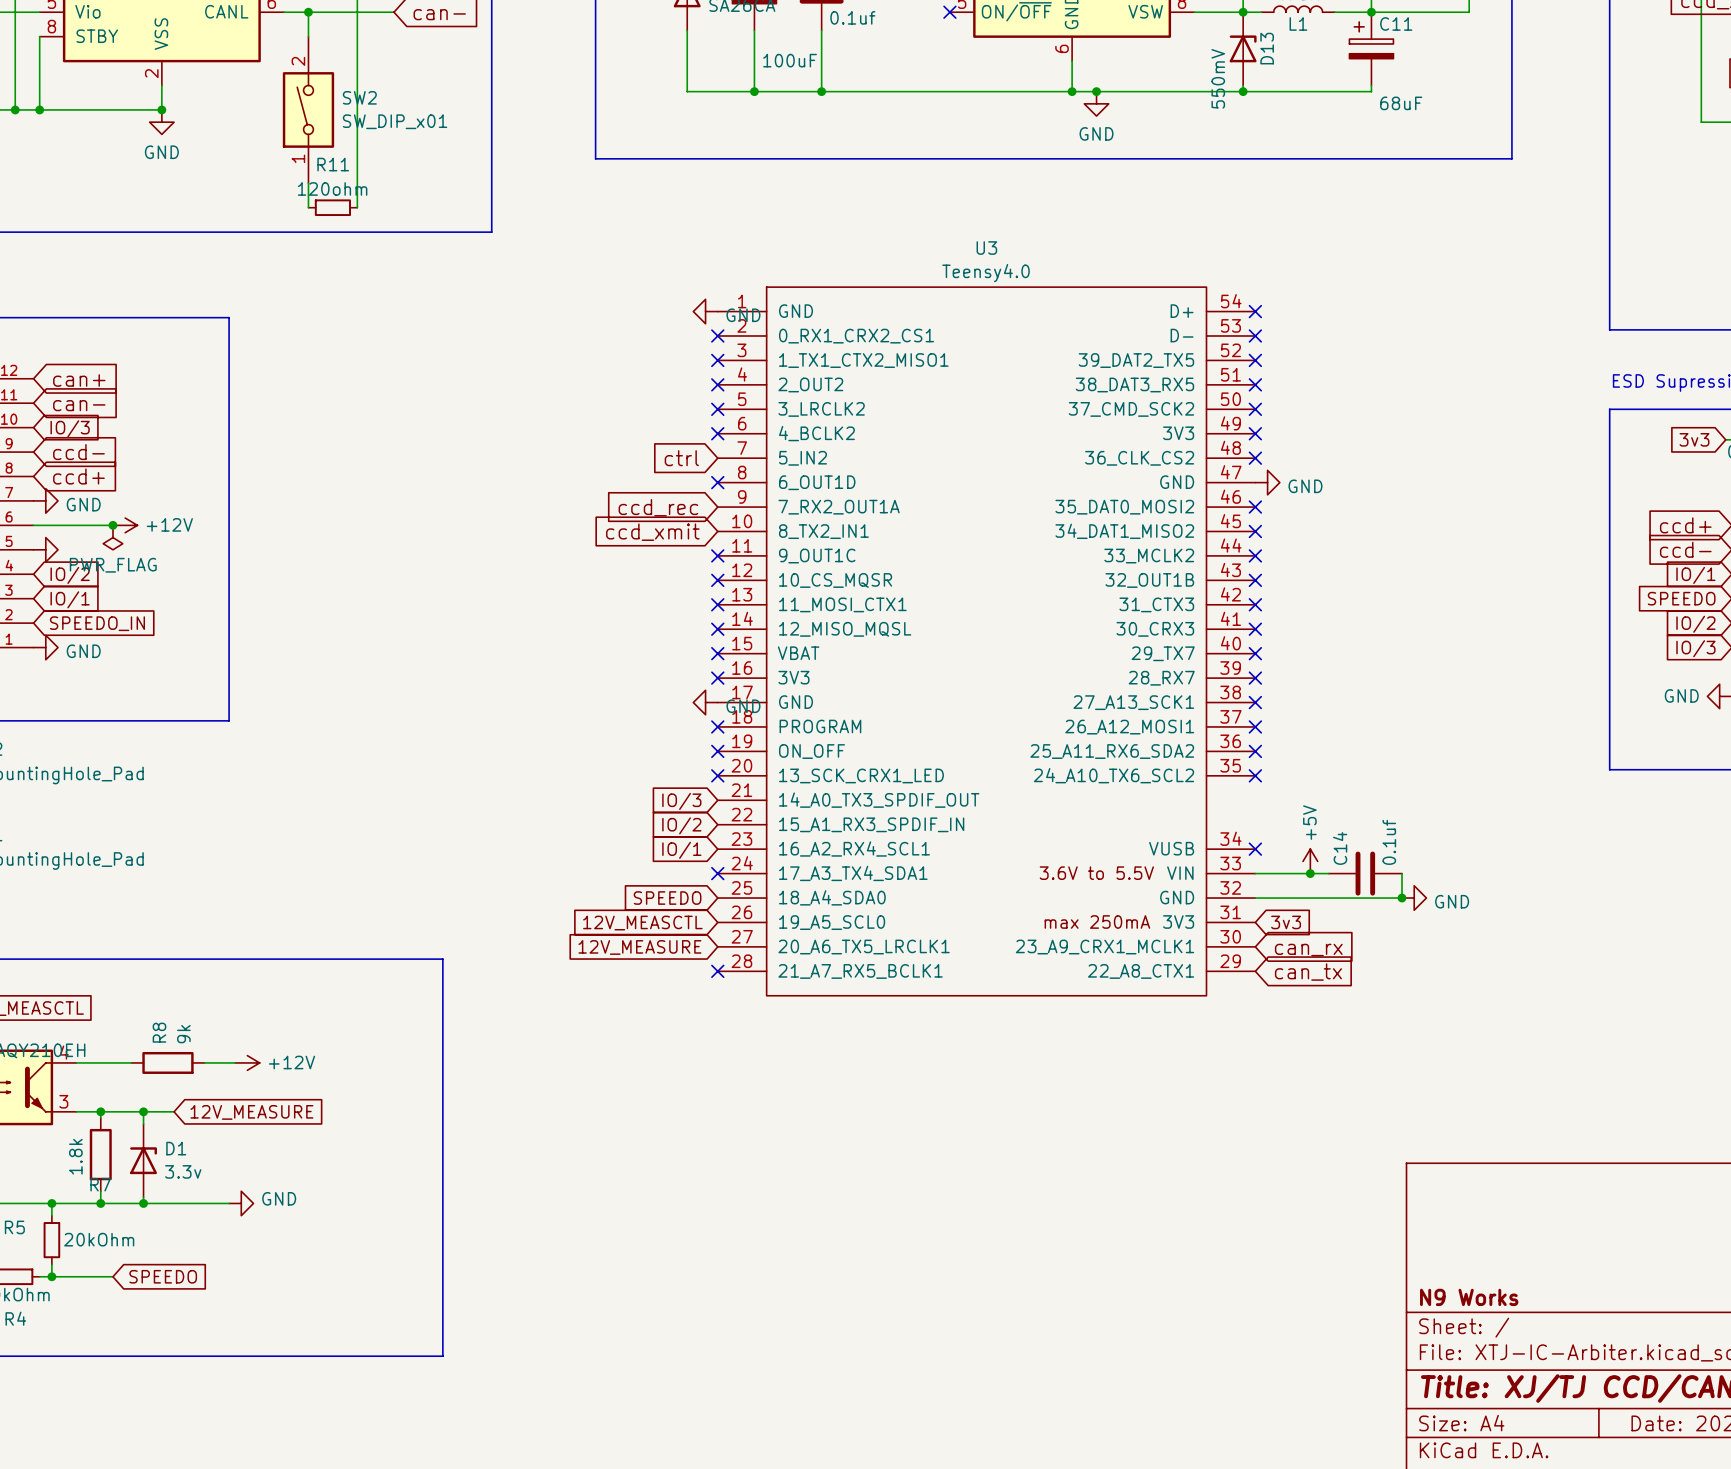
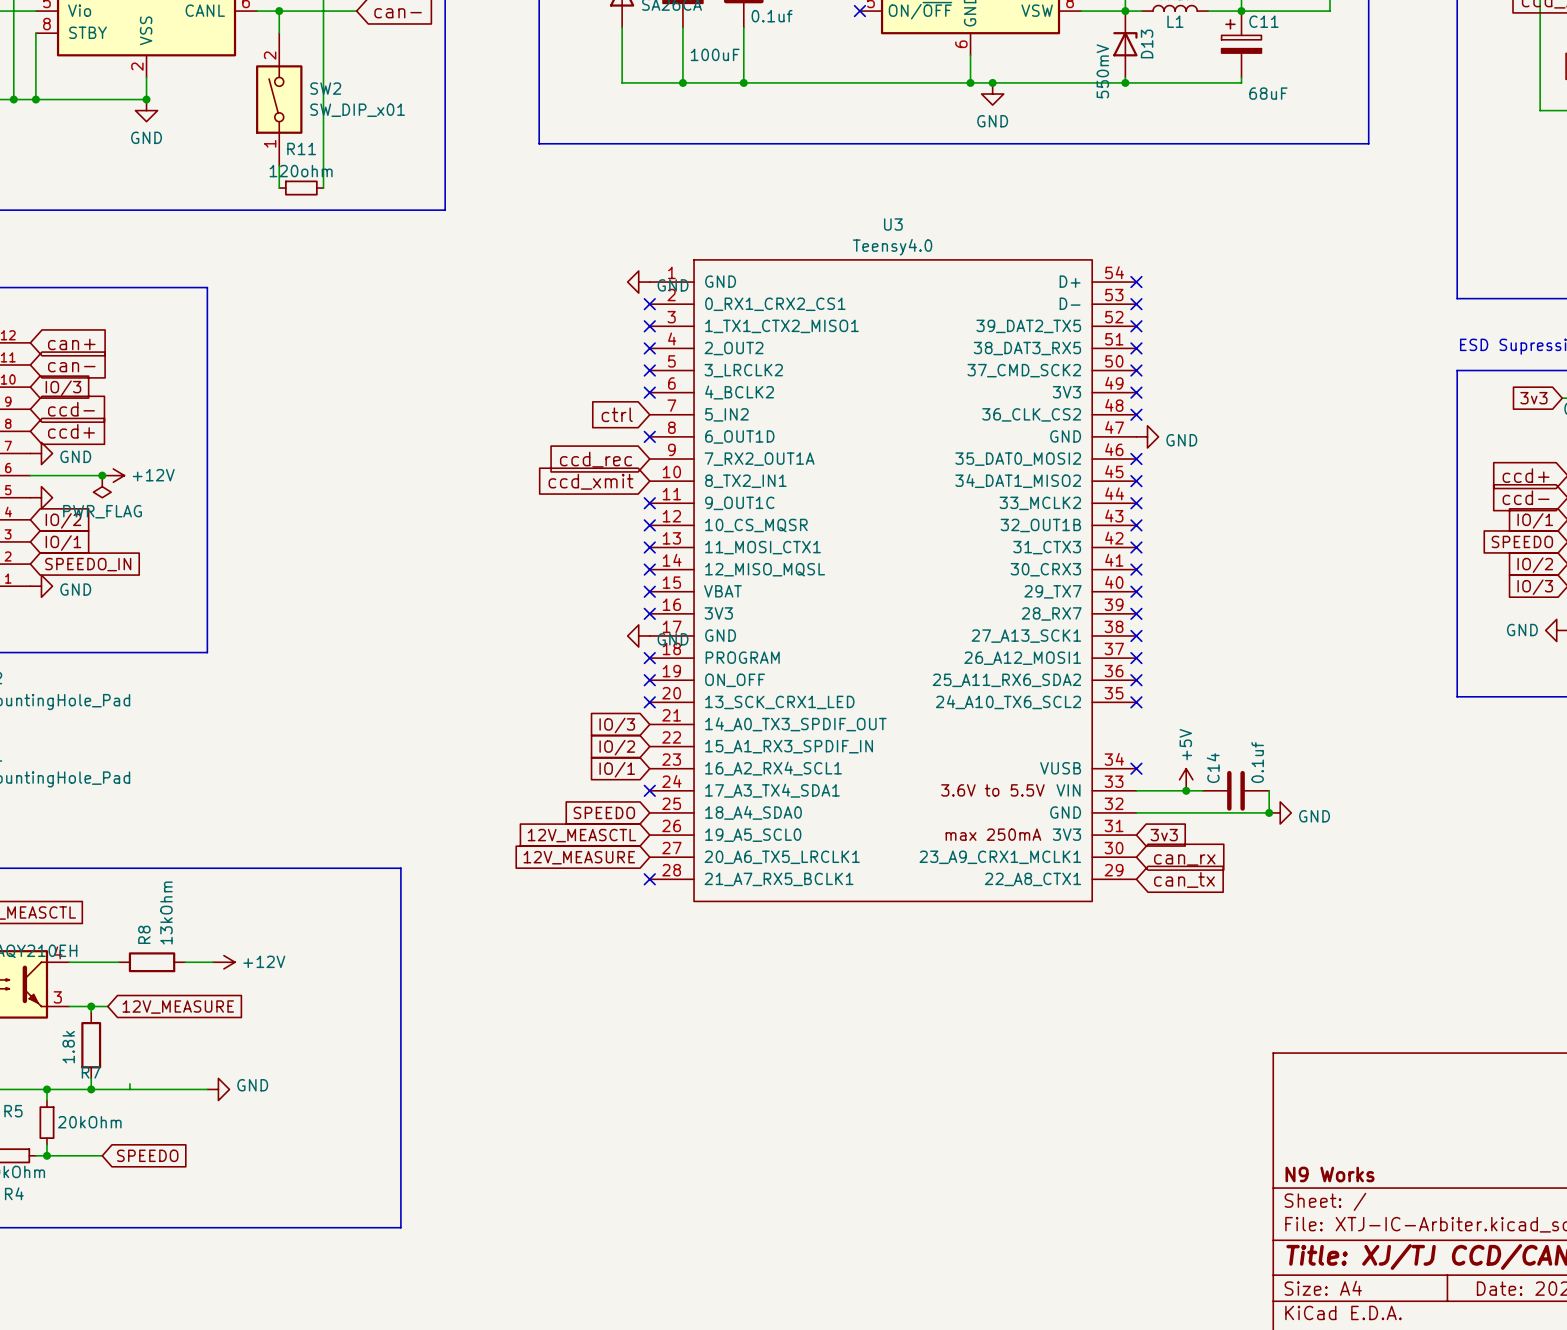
R8 value: 9k (183, 1034) -> 13kOhm (166, 912)
wire: (119, 1111) (174, 1111) -> none
wire: (143, 1111) (143, 1124) -> none
junction: (143, 1111) -> none
global label position: 12V_MEASURE (251, 1112) -> 12V_MEASURE (178, 1007)
D1: 3.3v (143, 1160) -> none
junction: (143, 1203) -> none

